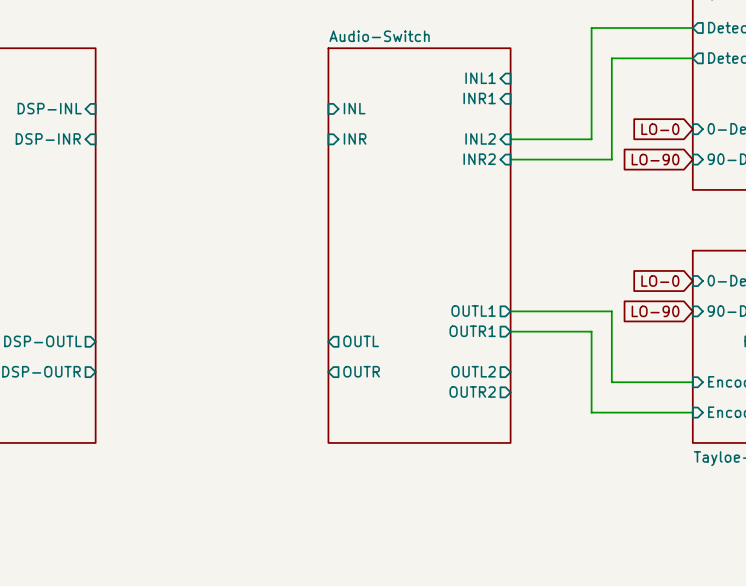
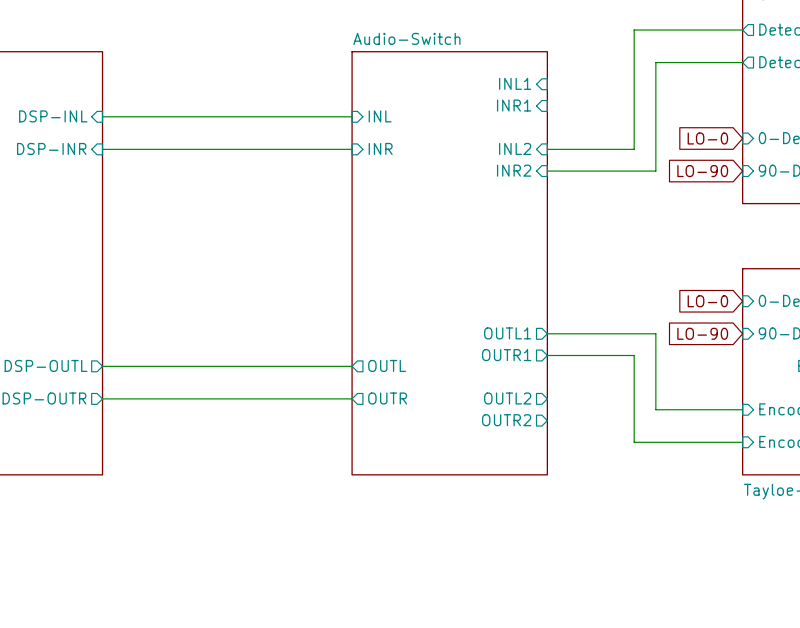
wire: none -> (102, 116) (352, 116)
wire: none -> (102, 149) (352, 149)
wire: none -> (102, 366) (352, 366)
wire: none -> (102, 398) (352, 398)

